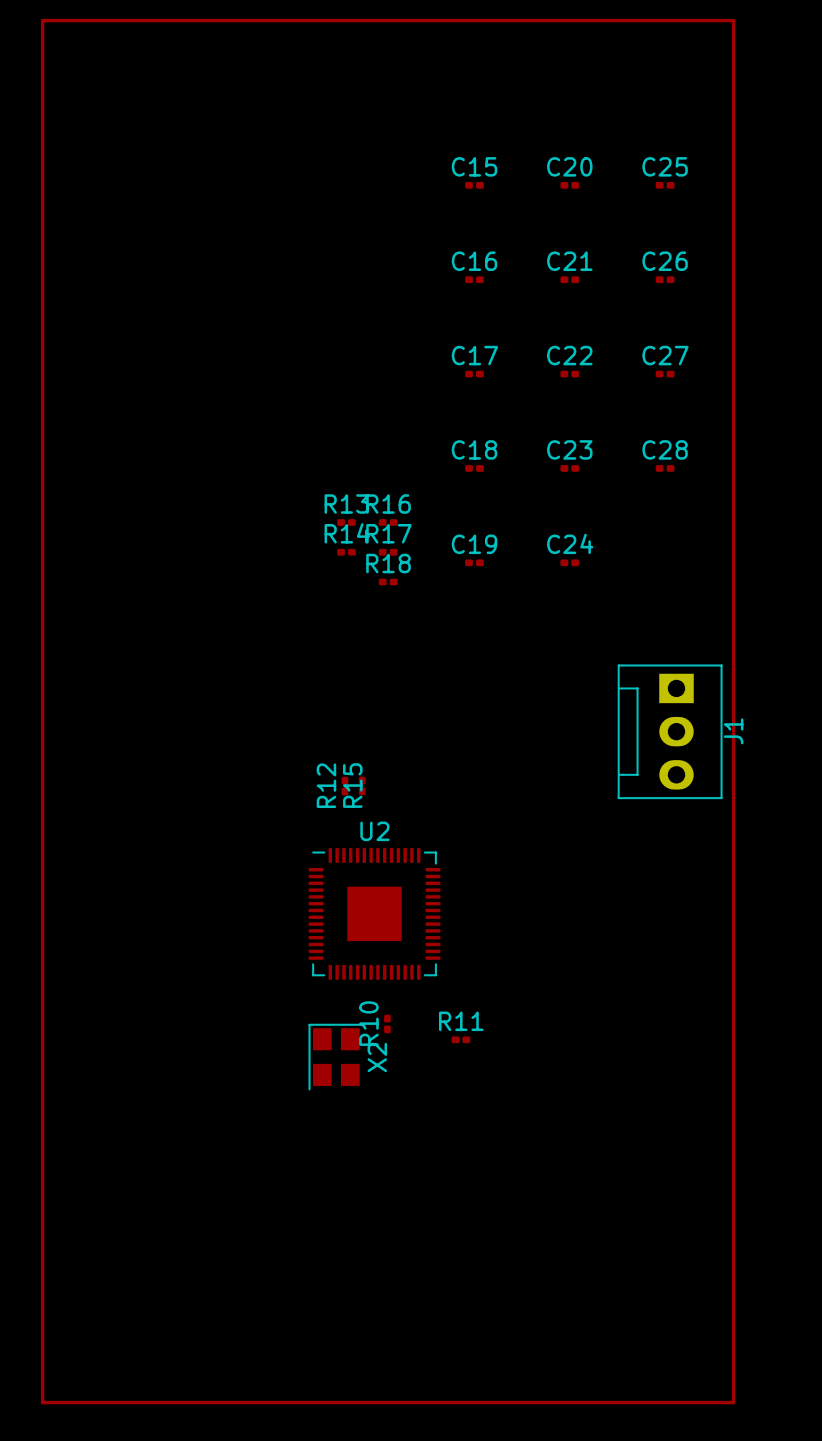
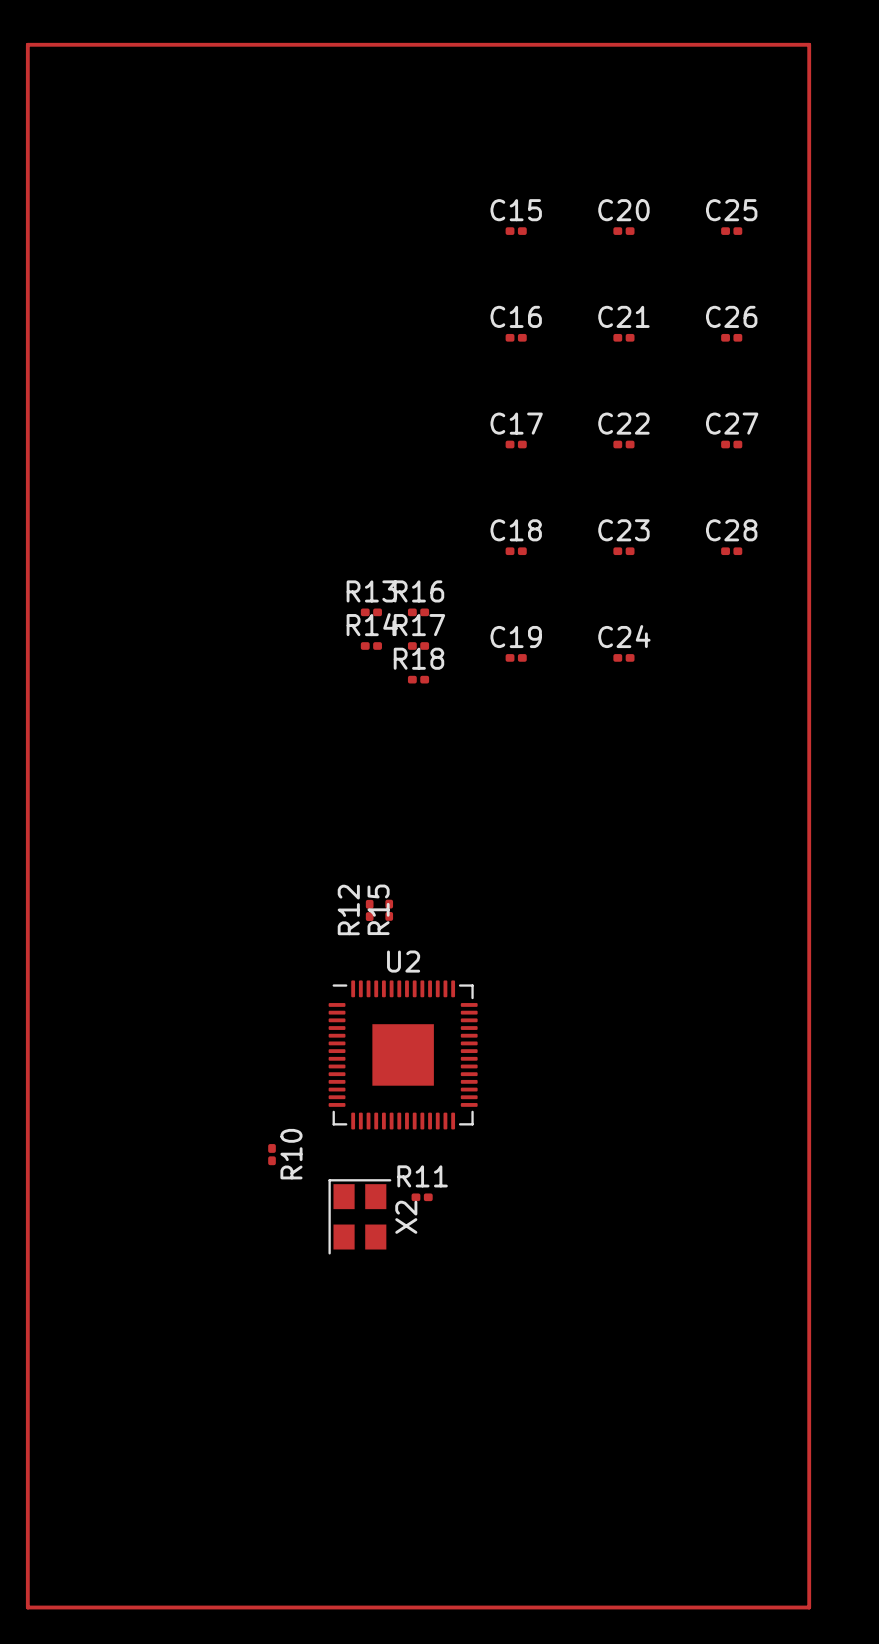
J1: (670, 731) -> none
R10 name position: R10 (368, 1023) -> R10 (291, 1154)
R10 position: (387, 1024) -> (272, 1154)
R11 position: (460, 1039) -> (422, 1197)

